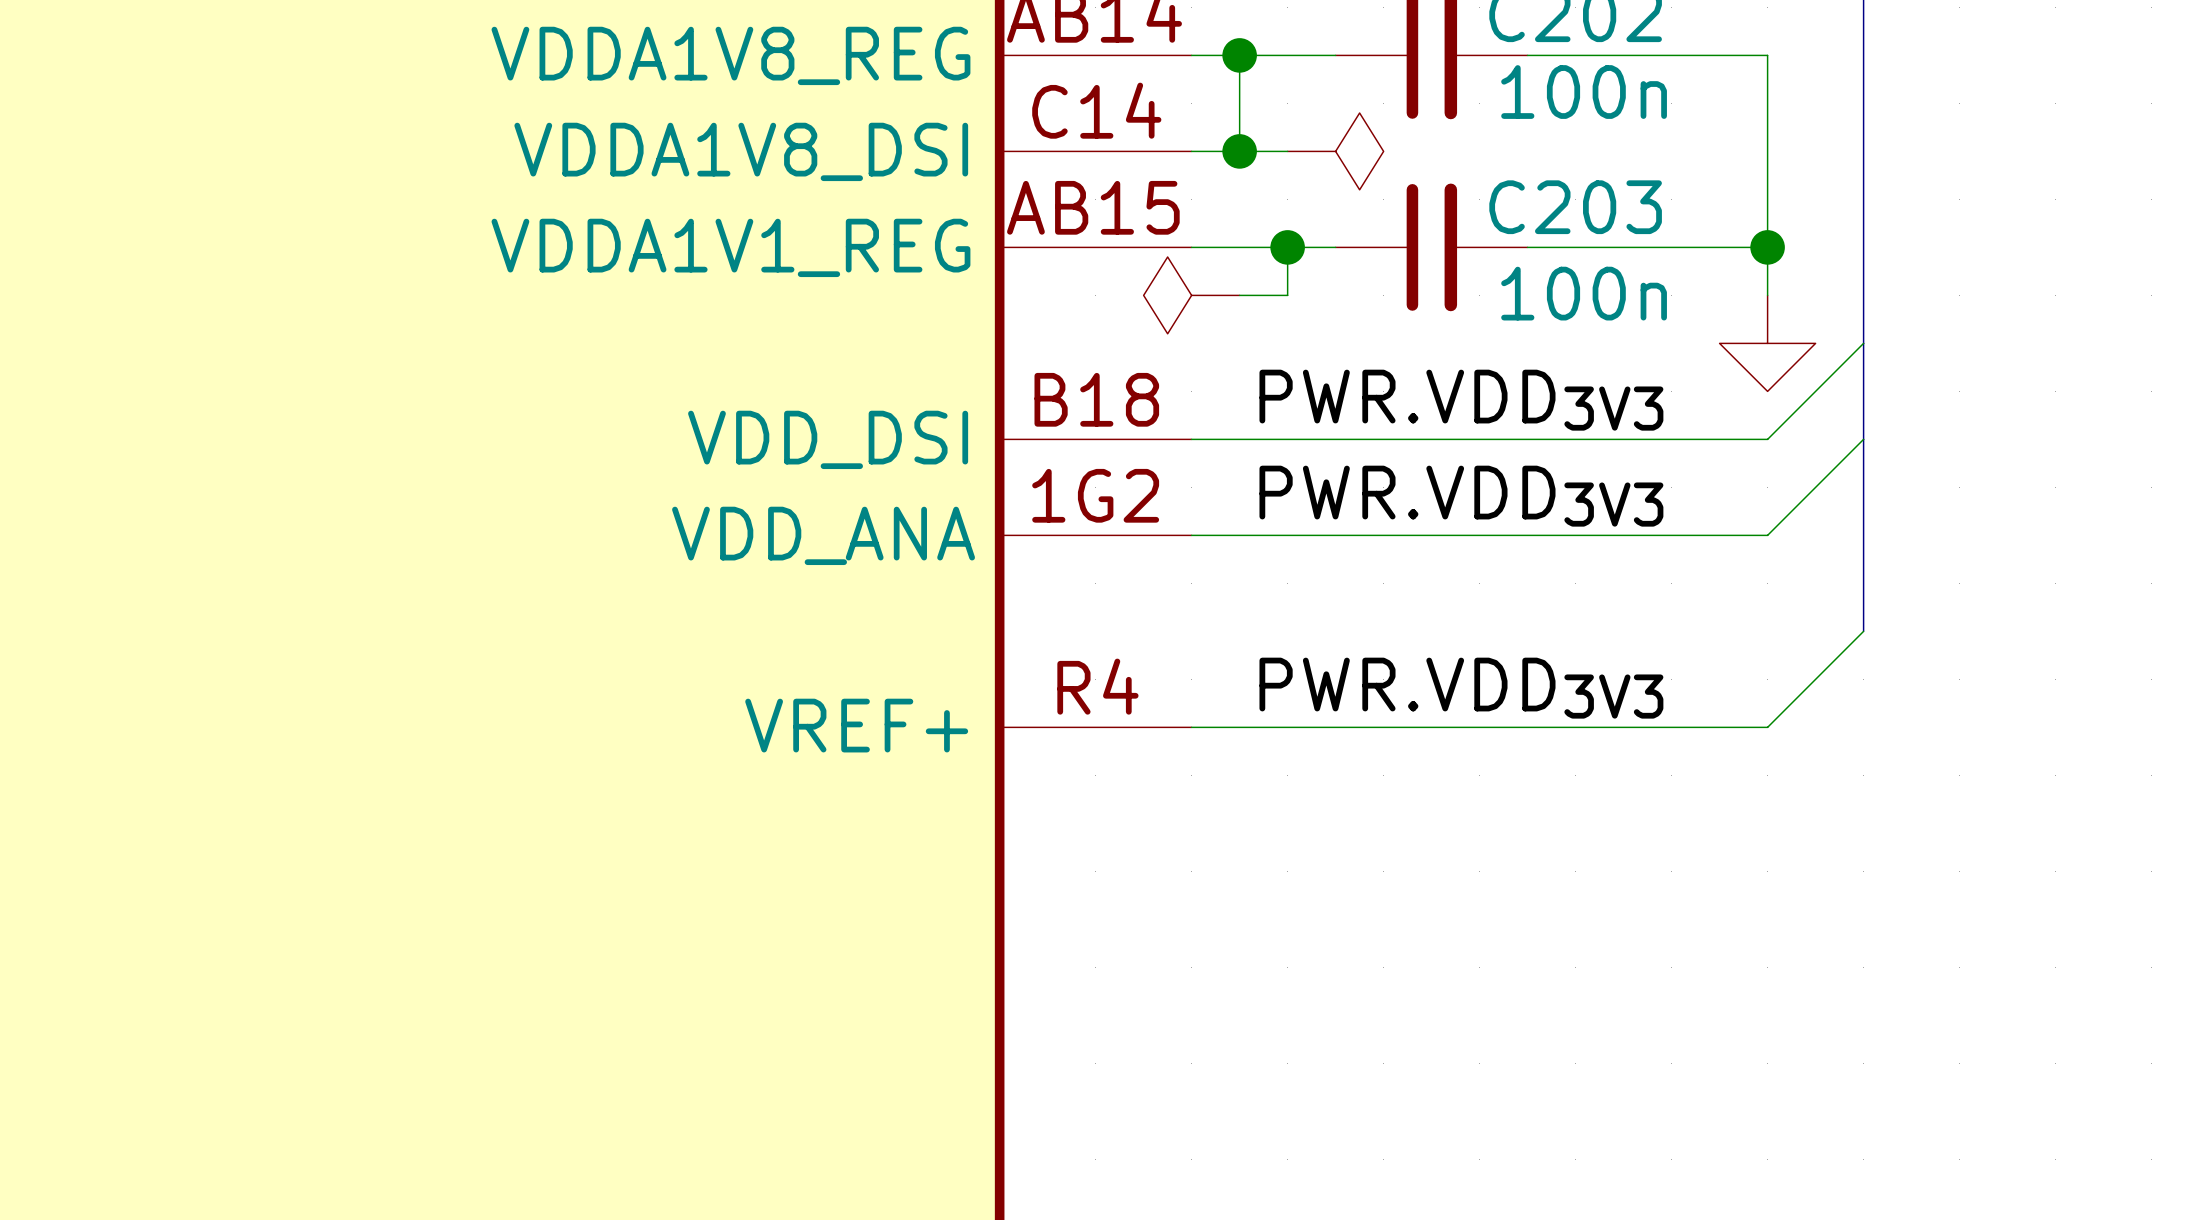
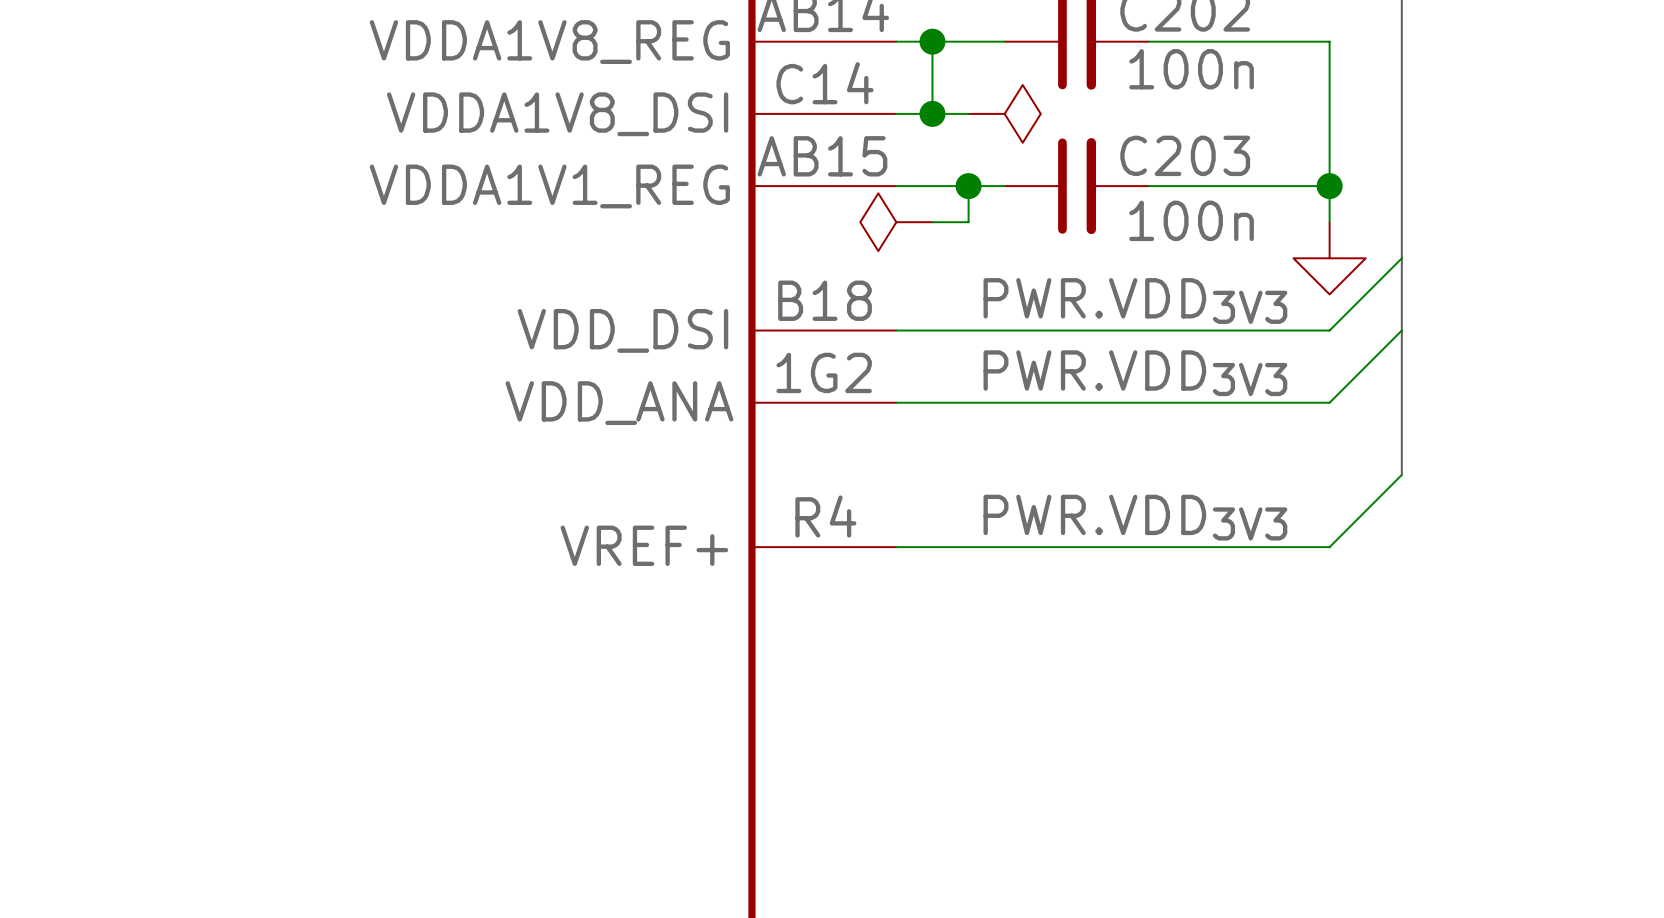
label position: PWR.VDD3V3 (1461, 400) -> PWR.VDD3V3 (1135, 301)
label position: PWR.VDD3V3 (1461, 496) -> PWR.VDD3V3 (1135, 373)
label position: PWR.VDD3V3 (1461, 688) -> PWR.VDD3V3 (1135, 517)

